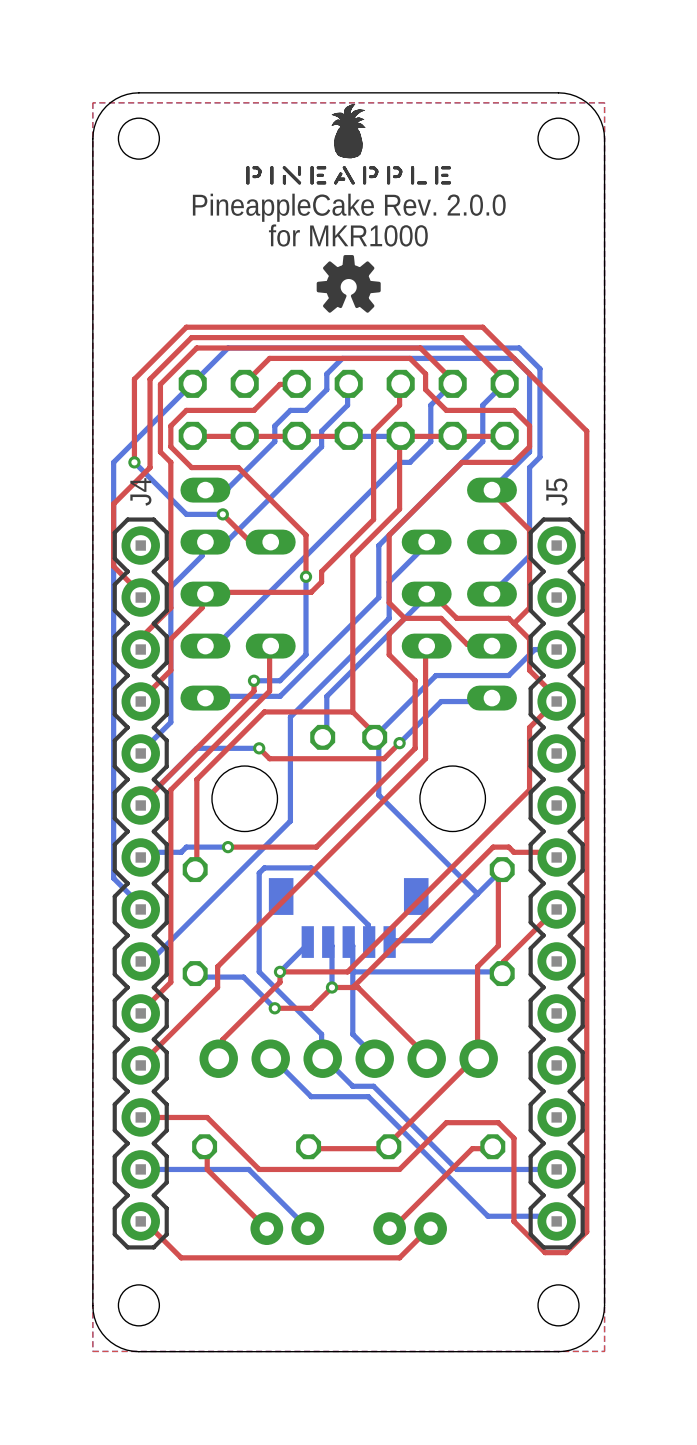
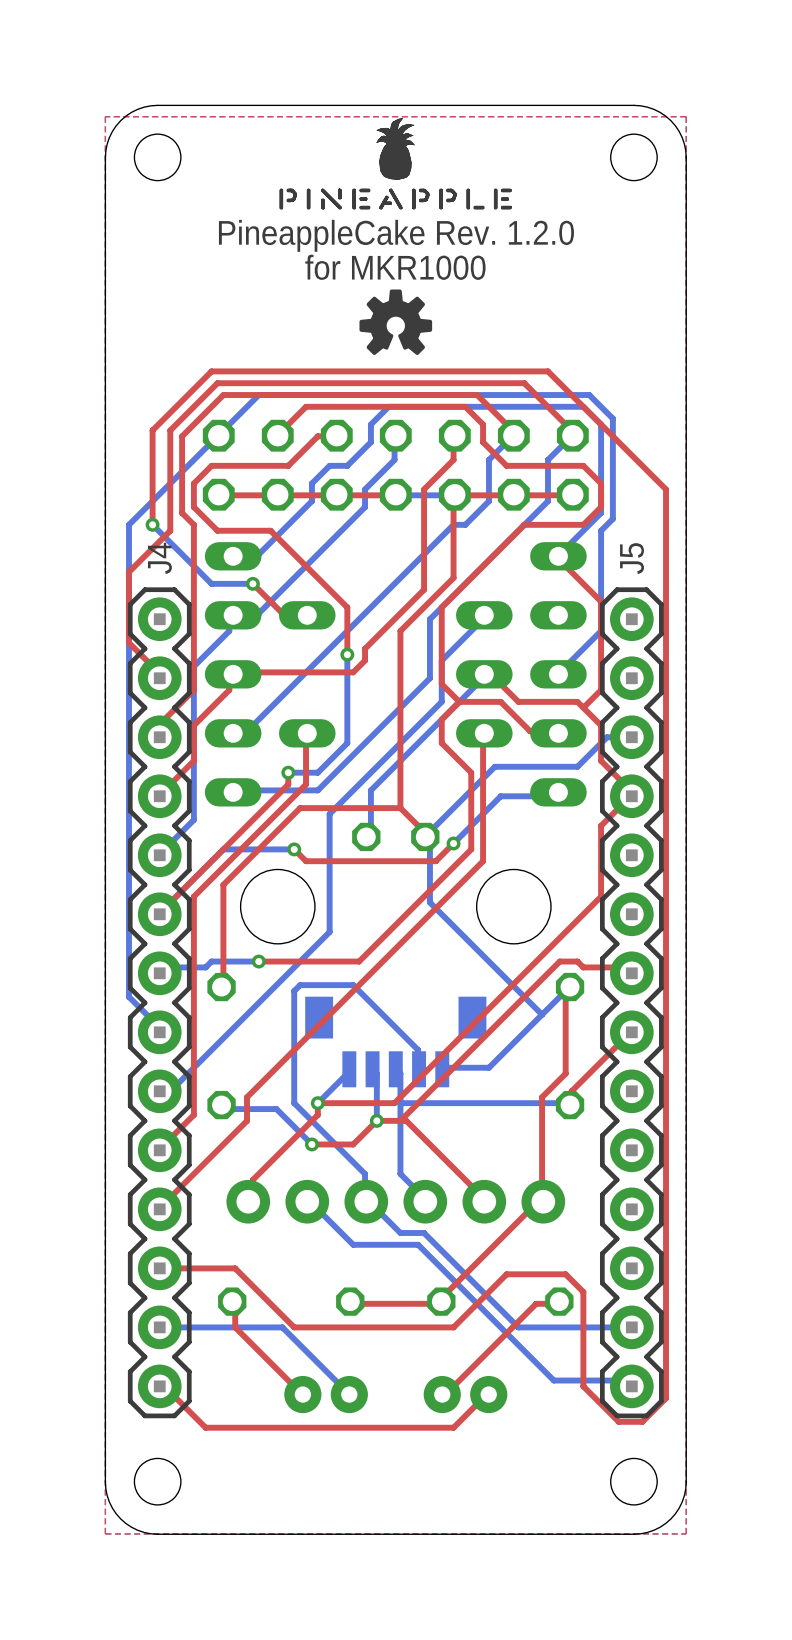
text: PineappleCake Rev. 2.0.0 (349, 207) -> PineappleCake Rev. 1.2.0 (396, 235)

